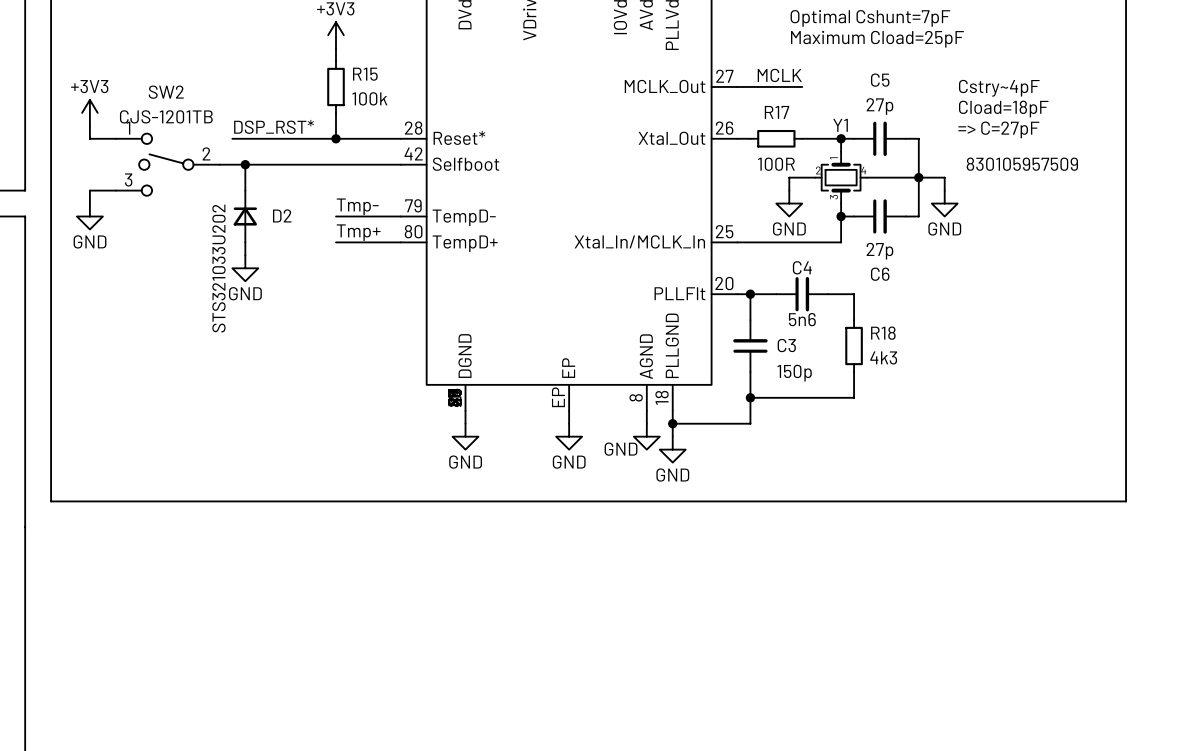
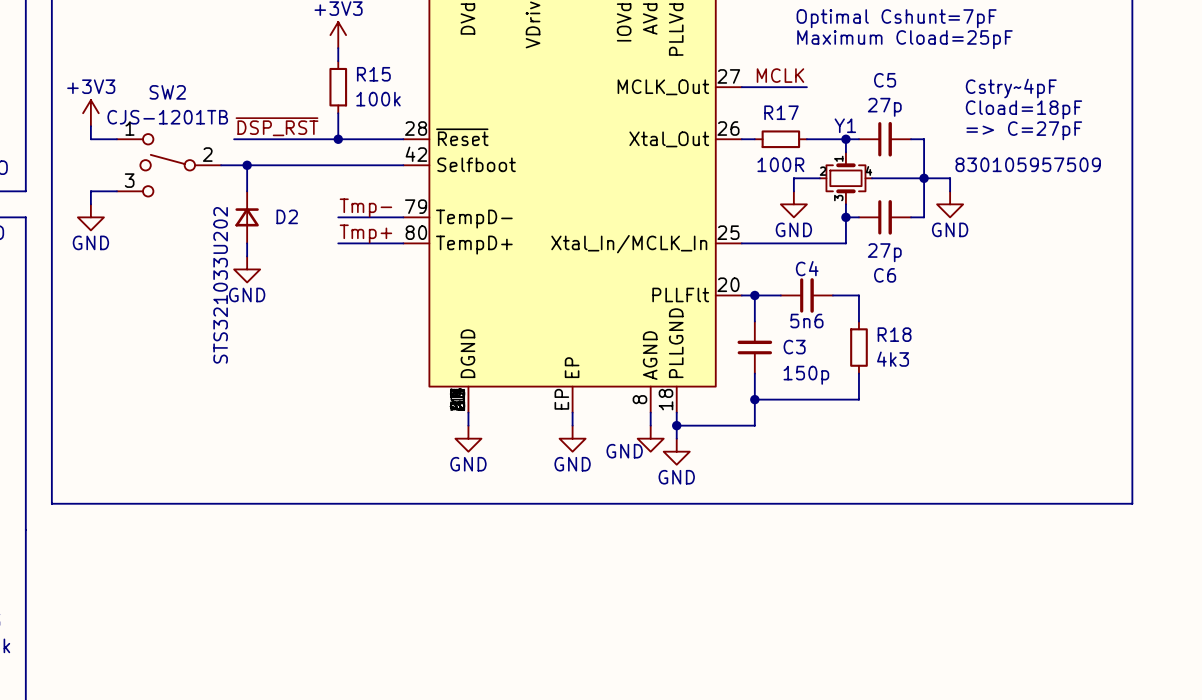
label: DSP_RST* (274, 126) -> ~{DSP_RST} (277, 126)
part pin name: Reset* (459, 137) -> ~{Reset} (462, 137)

